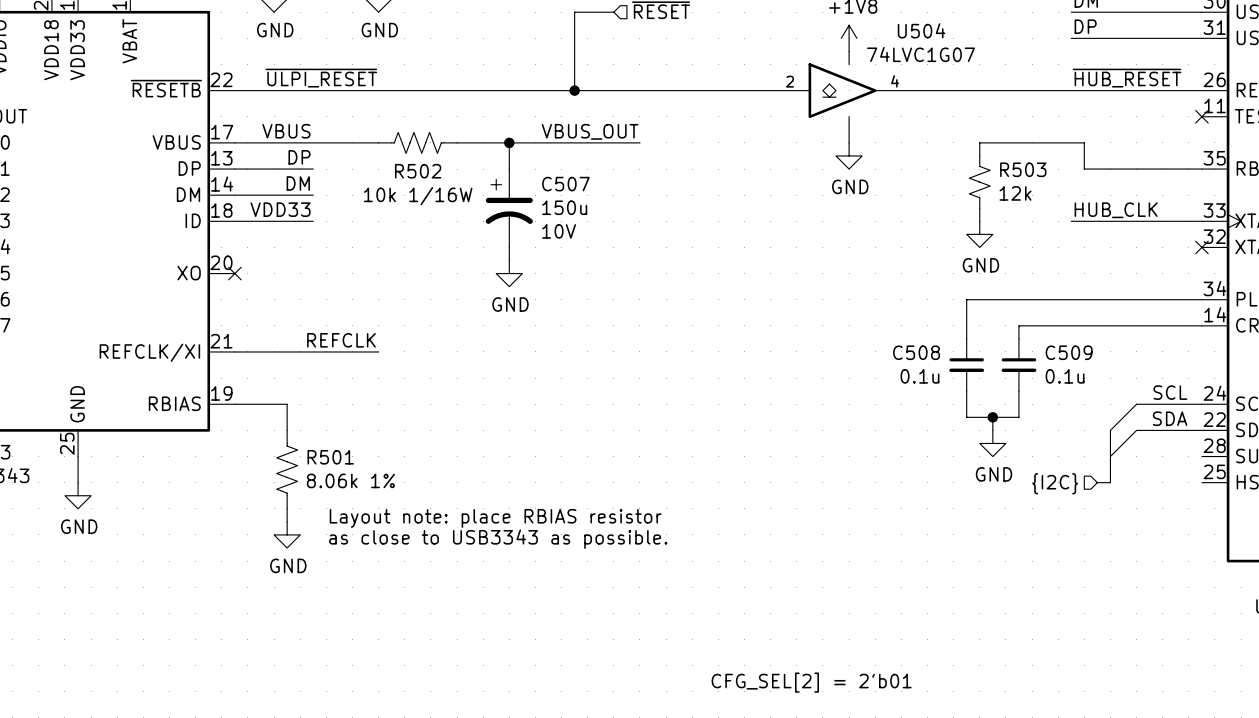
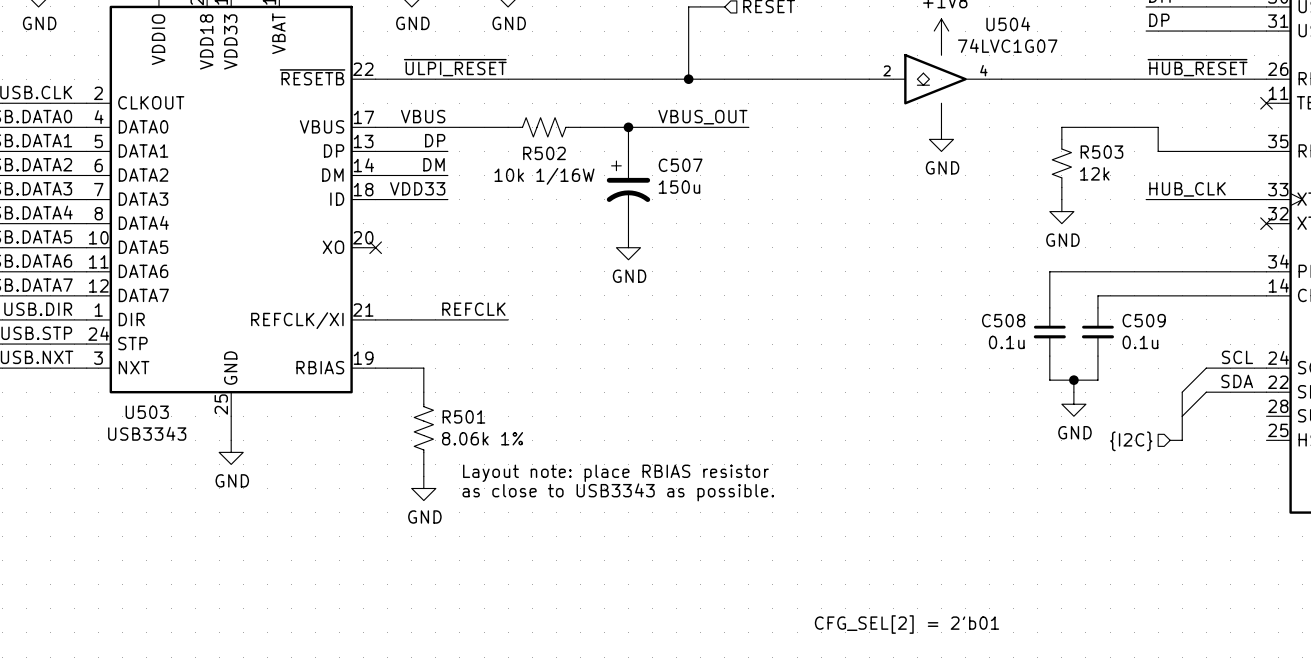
C507 text: 10V (559, 231) -> none

